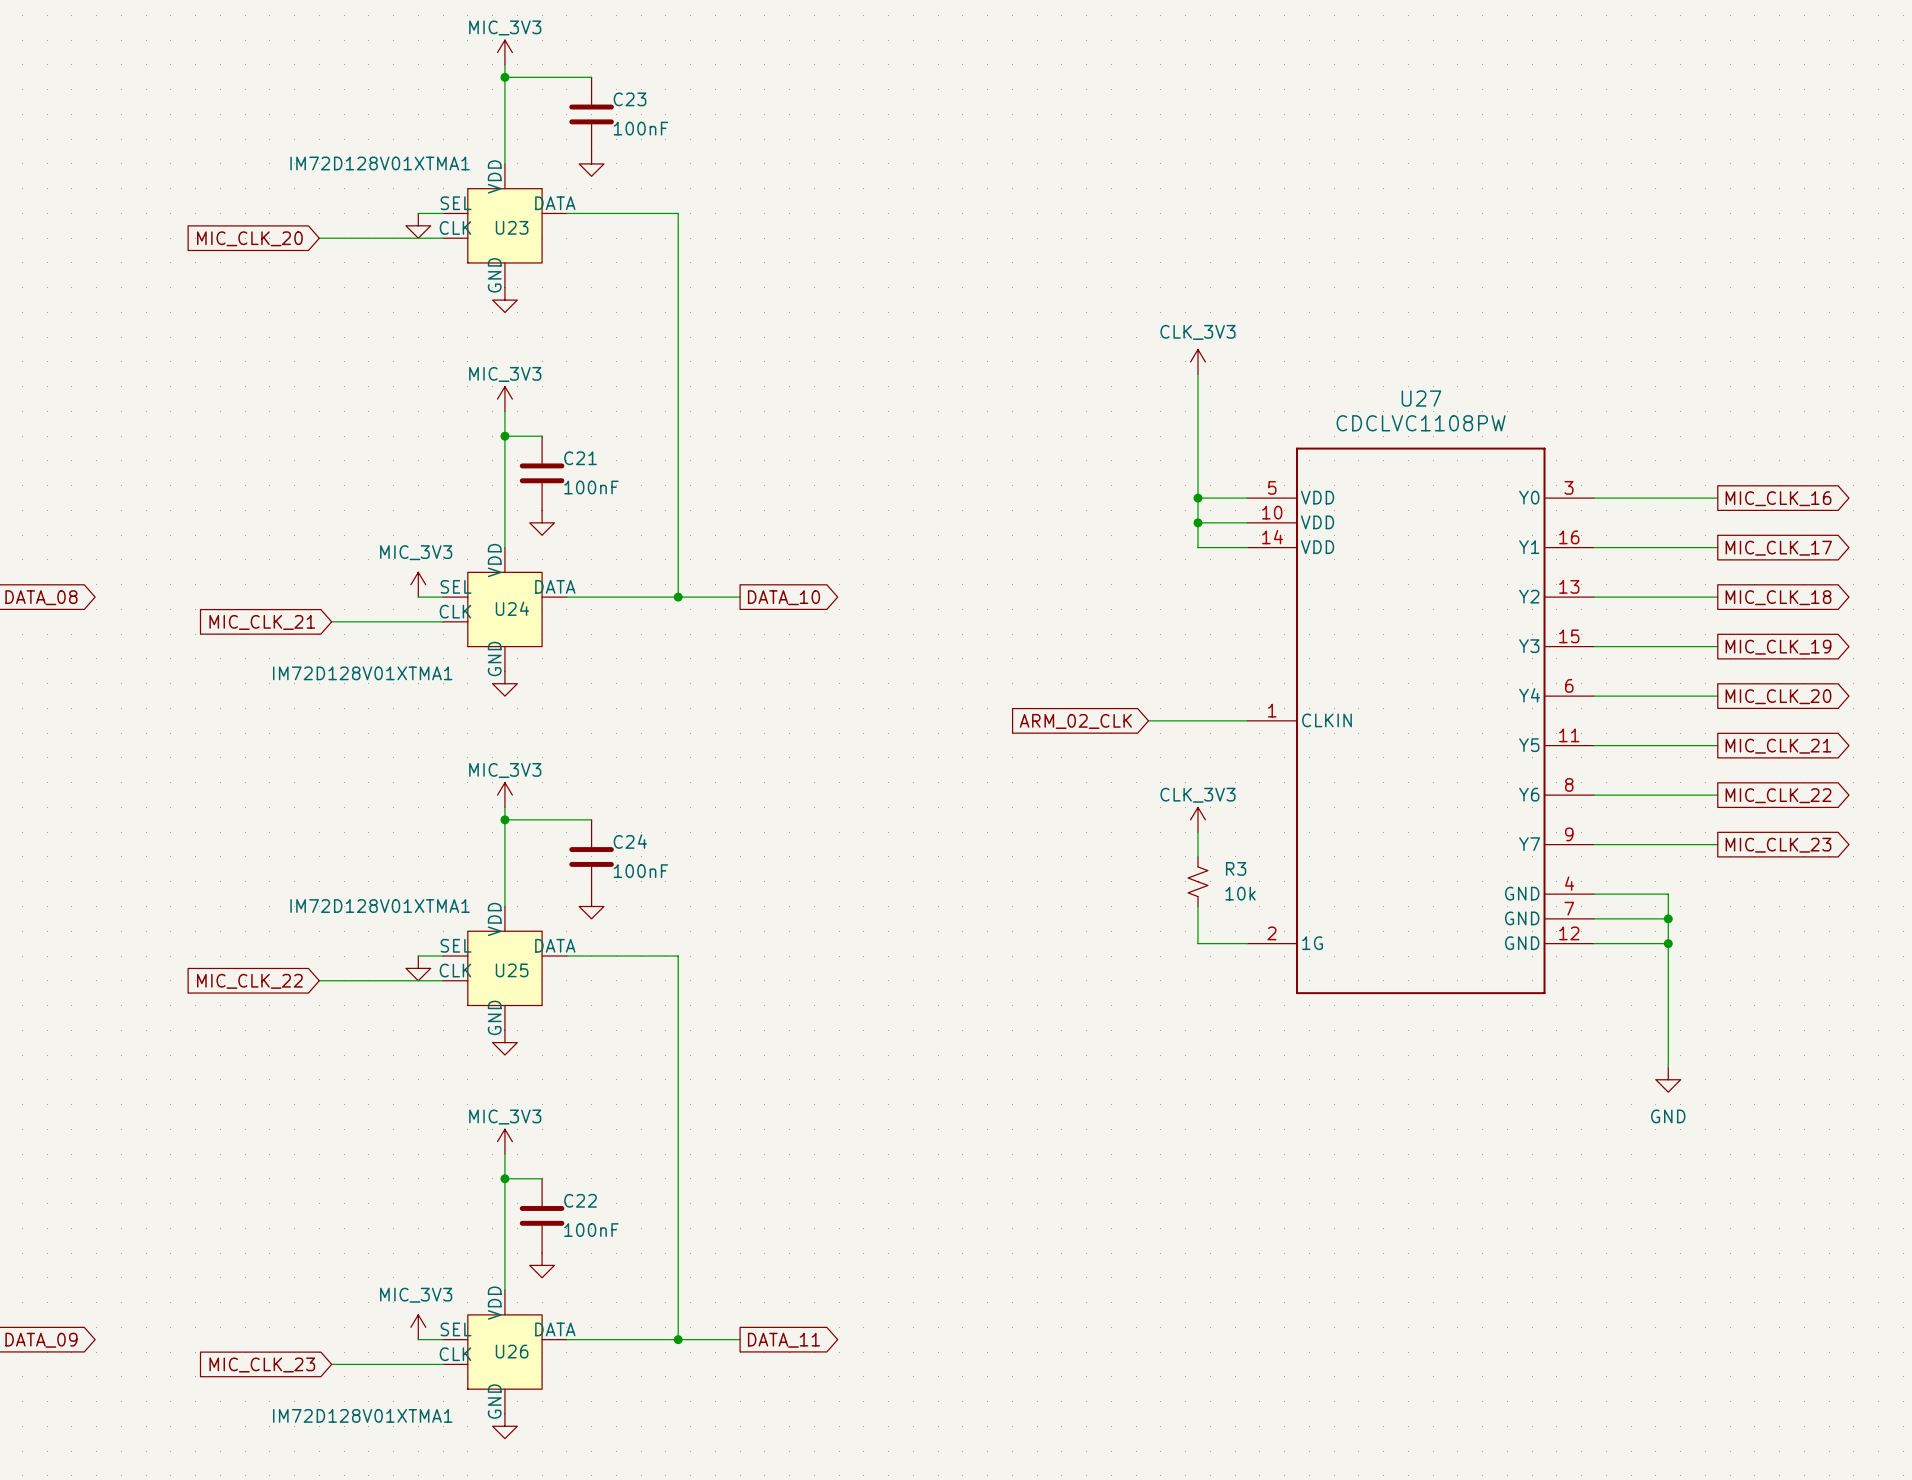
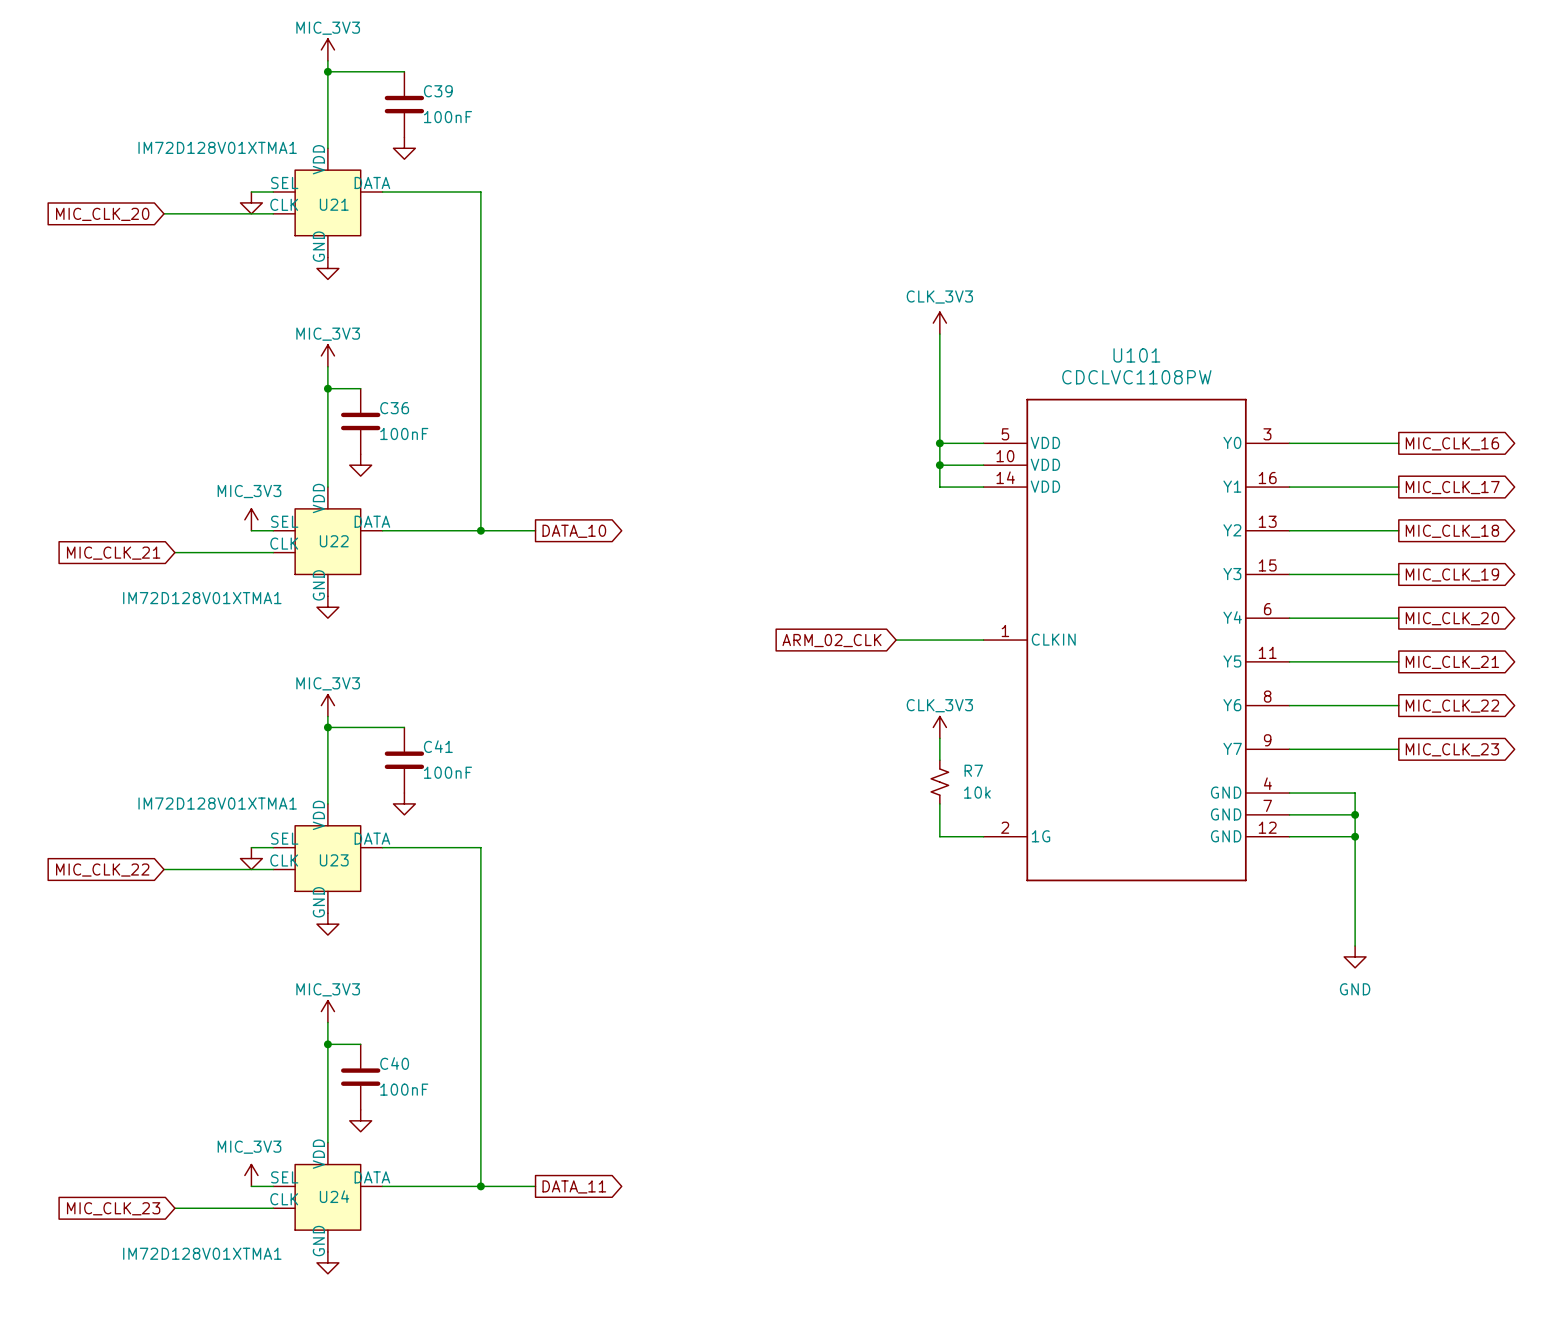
C23 name: C23 (630, 99) -> C39 (438, 91)
U23 name: U23 (512, 227) -> U21 (334, 204)
U27 name: U27 (1421, 398) -> U101 (1136, 355)
C21 name: C21 (580, 458) -> C36 (394, 408)
U24 name: U24 (512, 608) -> U22 (334, 541)
C24 name: C24 (630, 841) -> C41 (438, 746)
R3 name: R3 (1236, 868) -> R7 (973, 770)
U25 name: U25 (512, 970) -> U23 (334, 860)
C22 name: C22 (580, 1200) -> C40 (394, 1063)
U26 name: U26 (512, 1351) -> U24 (334, 1196)

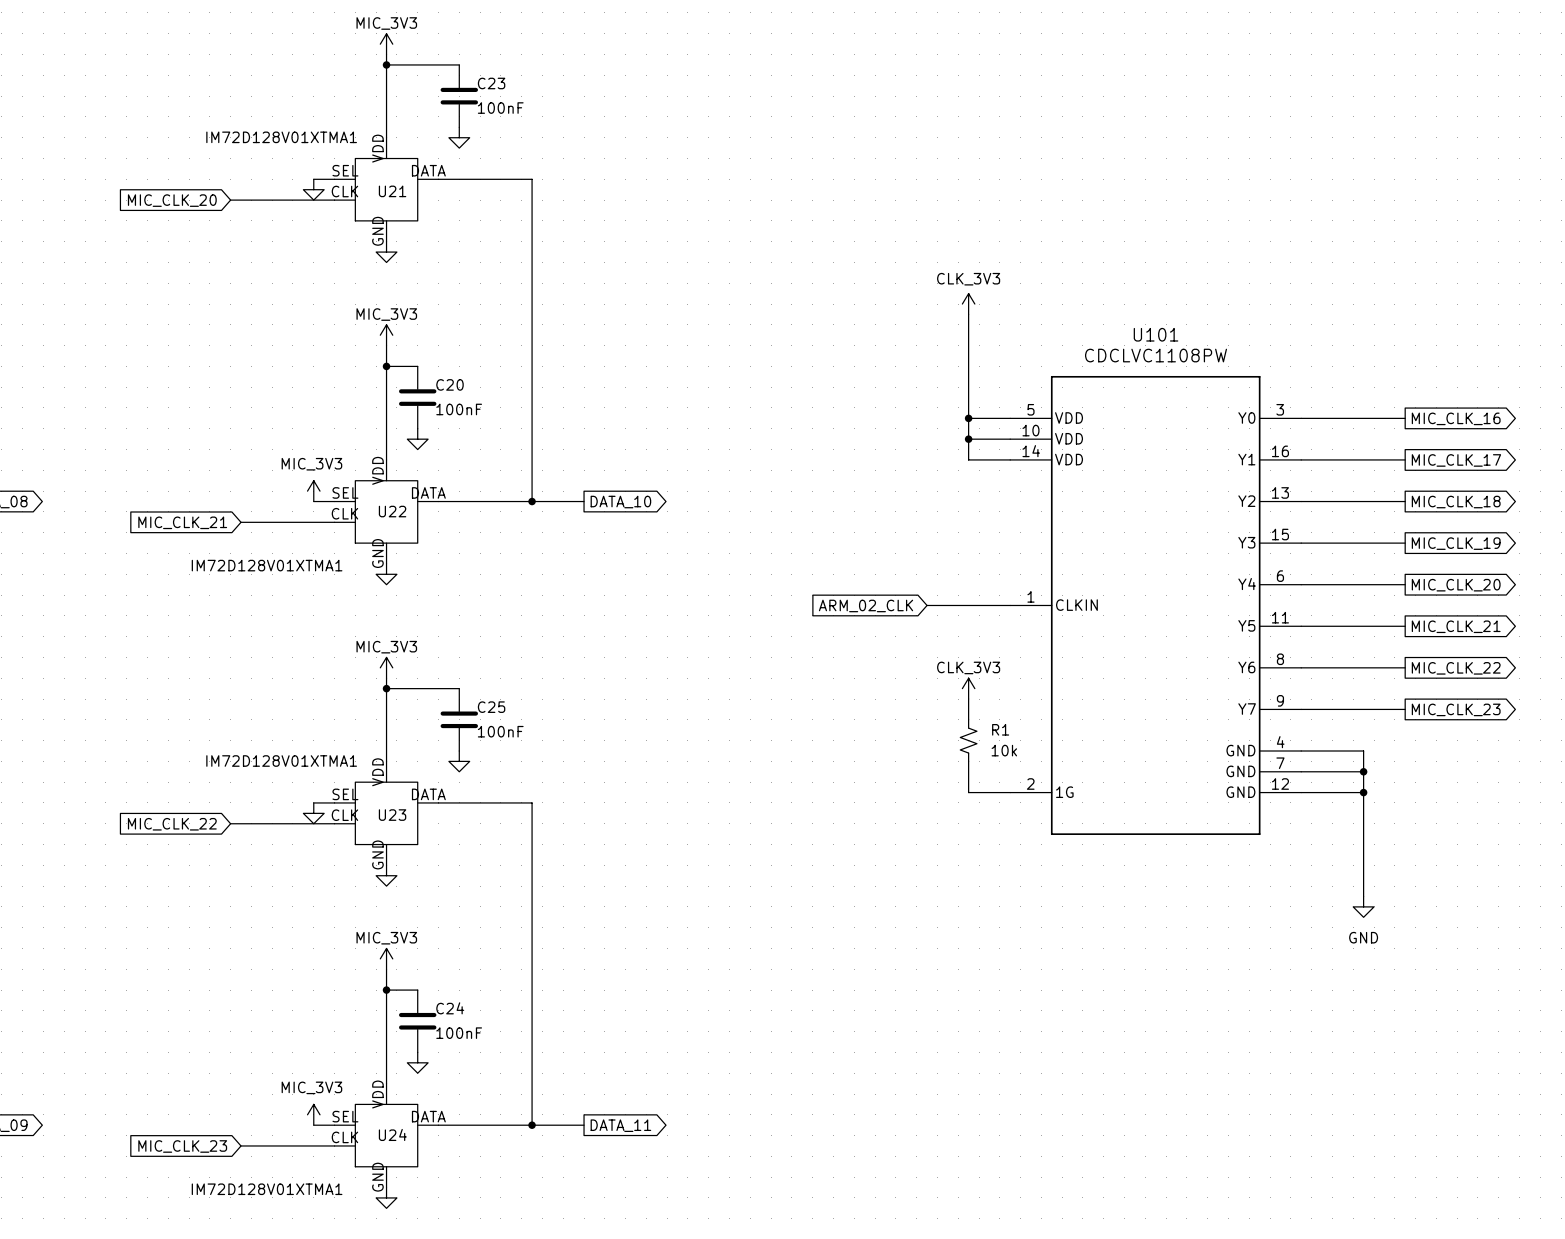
C39 name: C39 (438, 91) -> C23 (491, 83)
C36 name: C36 (394, 408) -> C20 (450, 384)
C41 name: C41 (438, 746) -> C25 (491, 707)
R7 name: R7 (973, 770) -> R1 (1000, 729)
C40 name: C40 (394, 1063) -> C24 (450, 1008)

